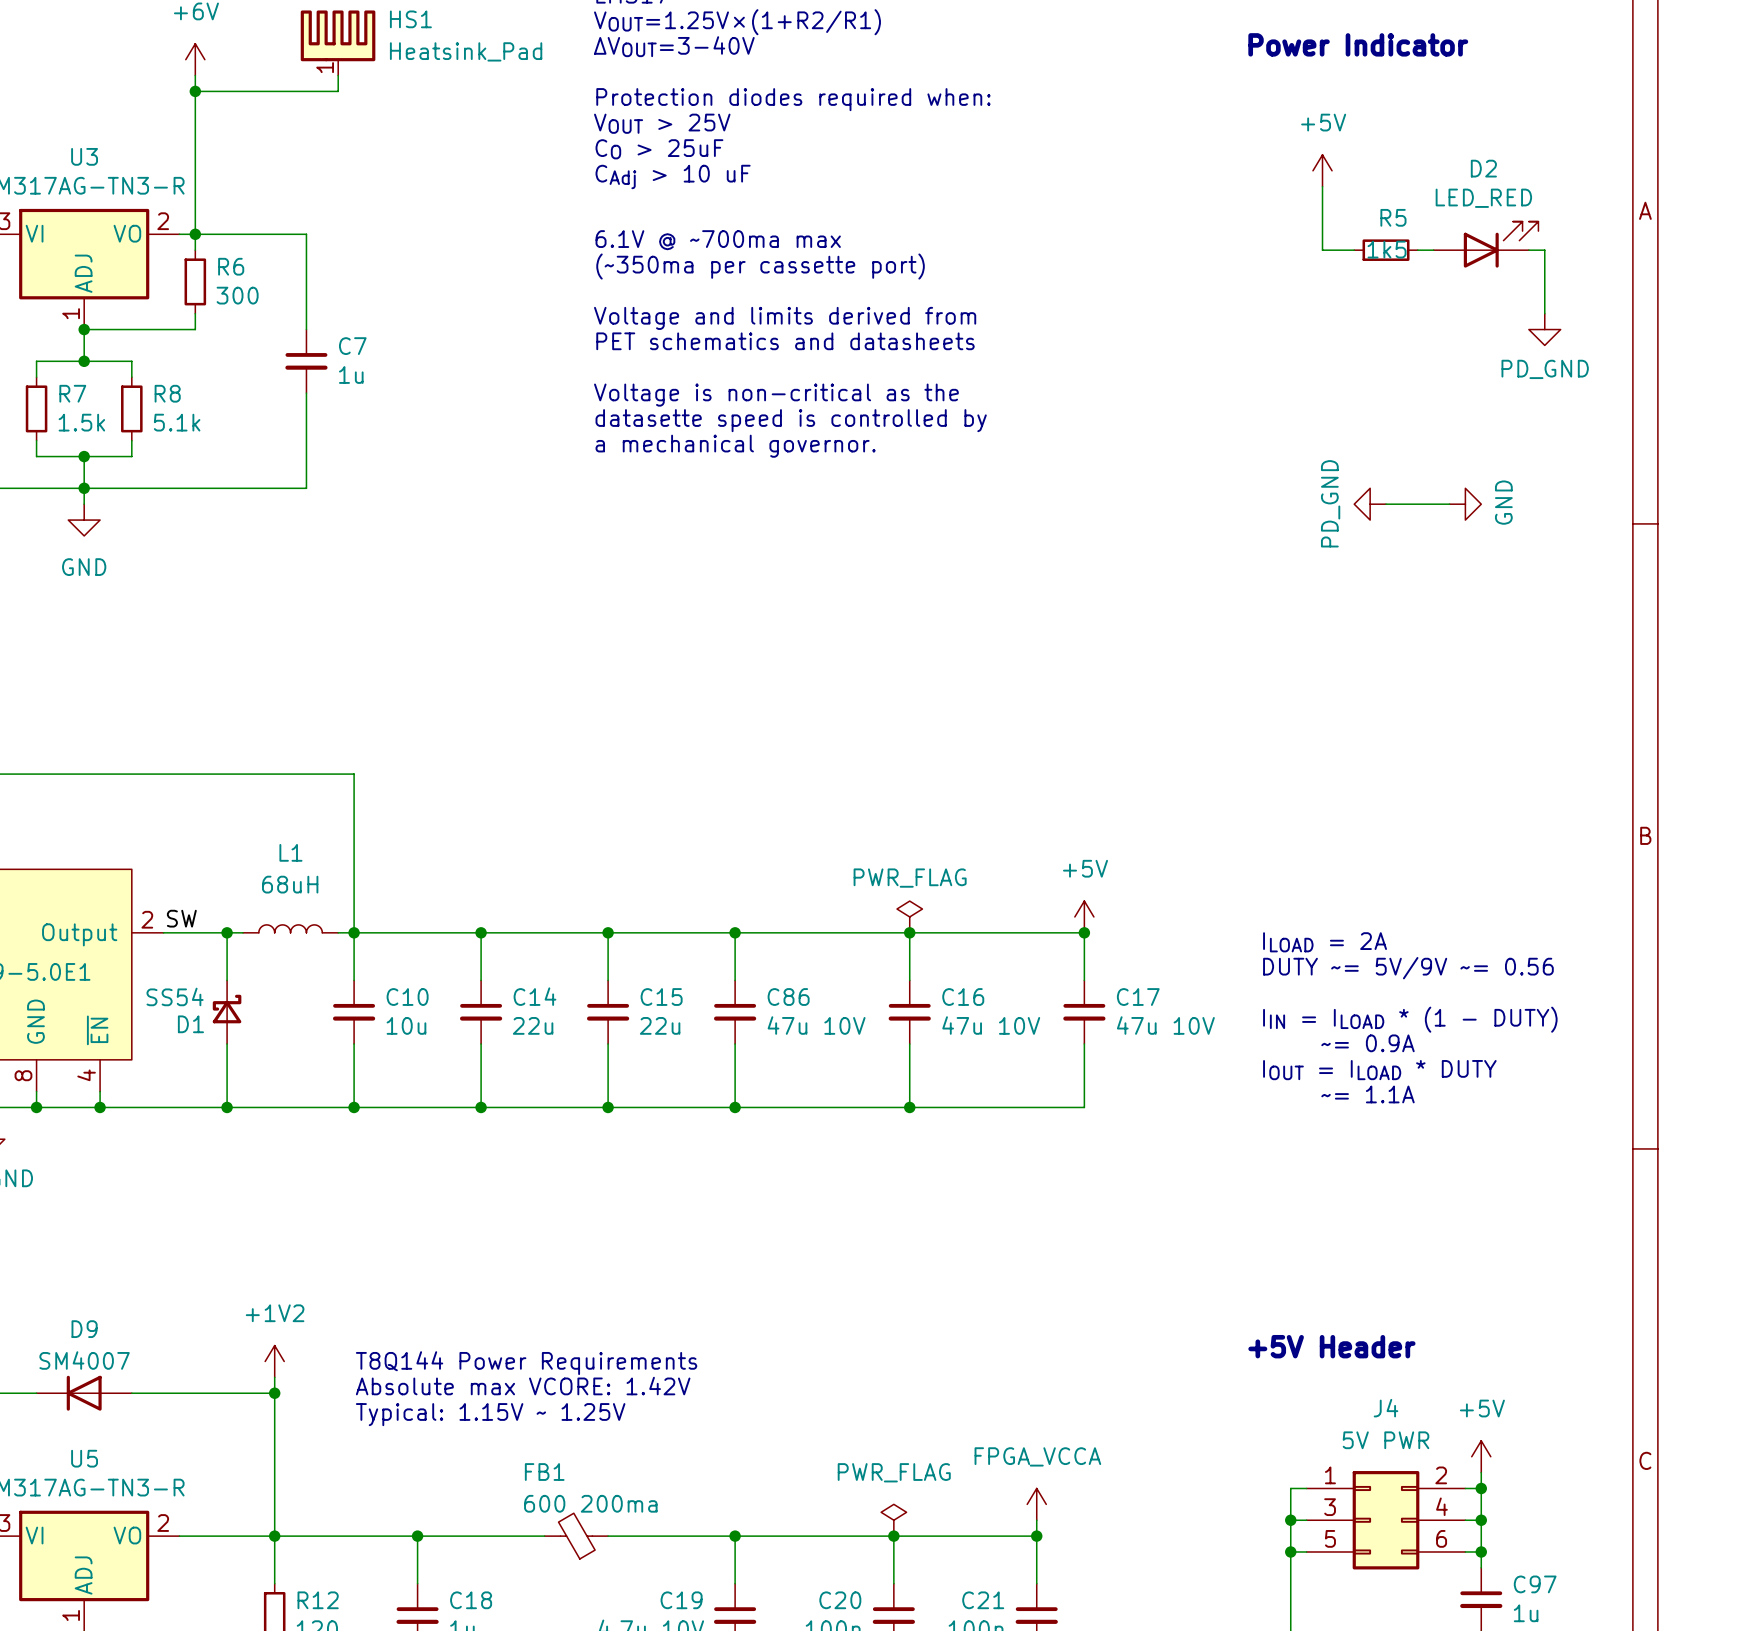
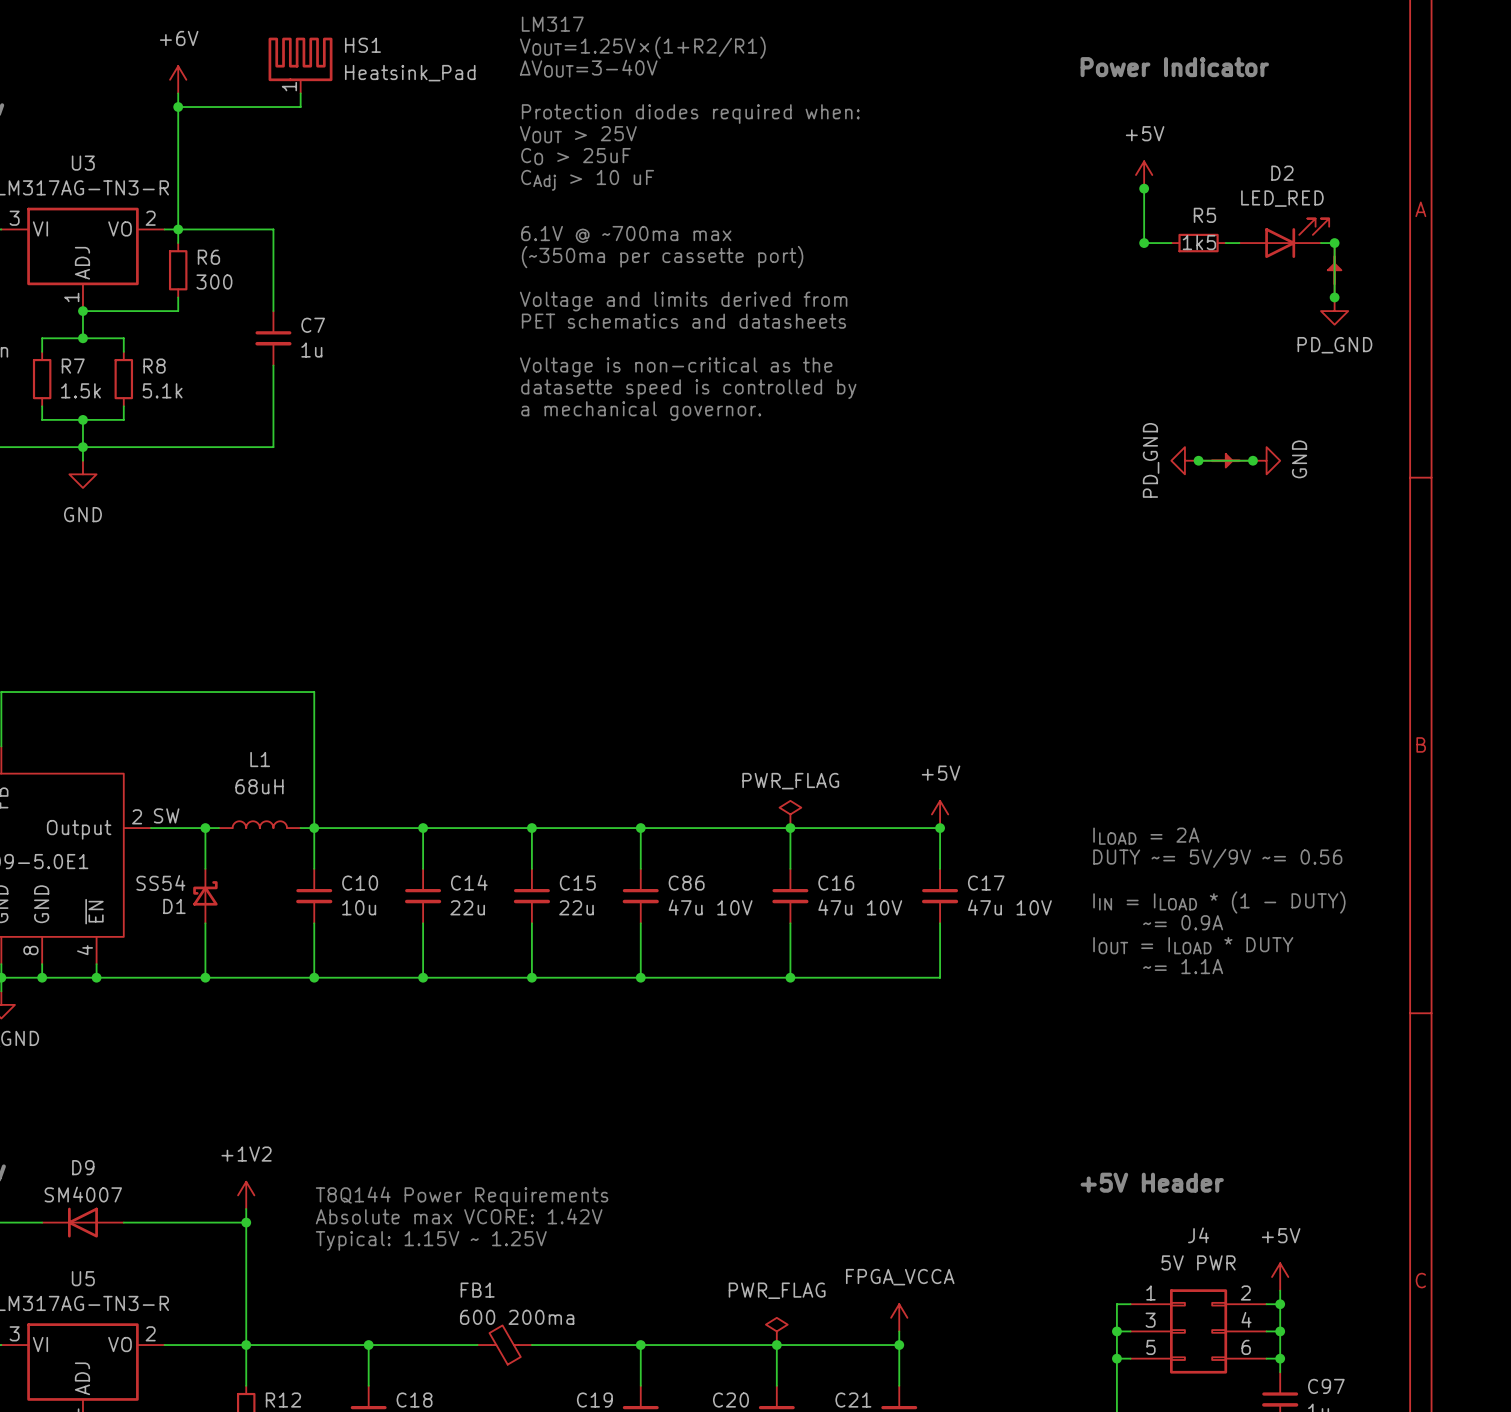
junction: none -> (1144, 188)
junction: none -> (1144, 243)
junction: none -> (1334, 243)
part: none -> (1334, 270)
junction: none -> (1334, 297)
junction: none -> (1198, 460)
part: none -> (1225, 460)
junction: none -> (1252, 460)

